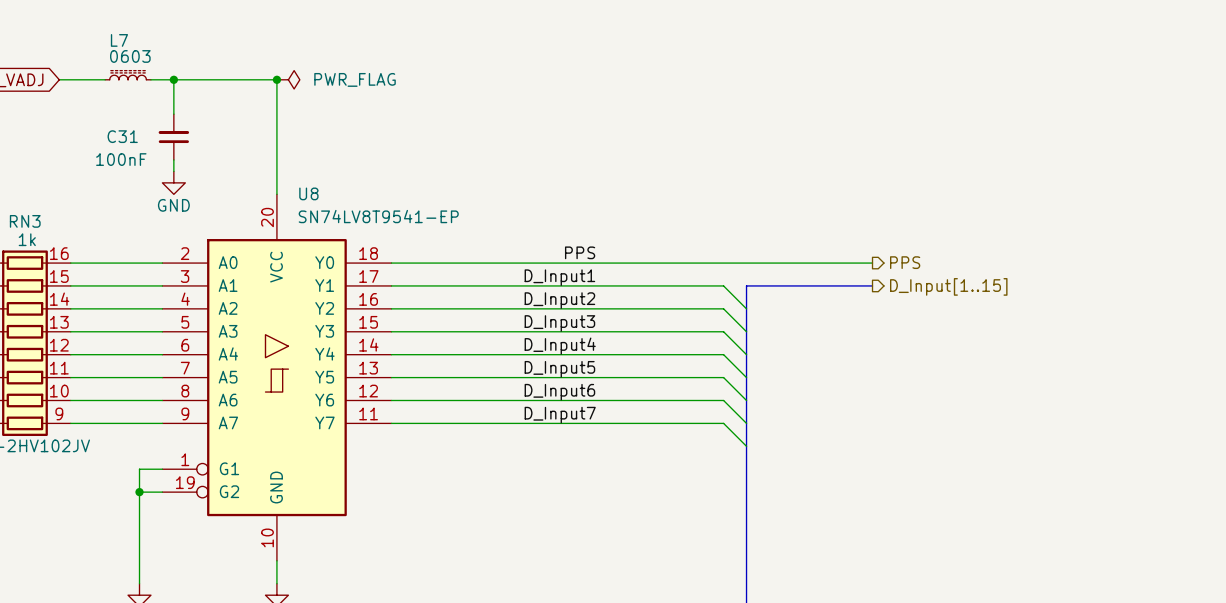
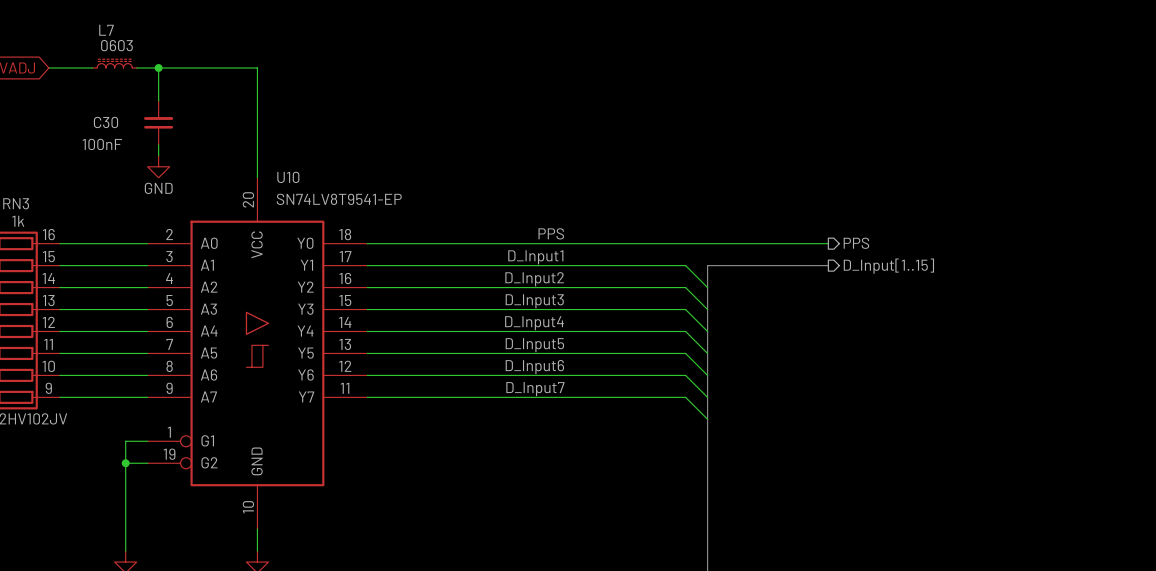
junction: (276, 79) -> none
power symbol: PWR_FLAG (288, 79) -> none
C31 name: C31 (122, 136) -> C30 (105, 122)
U8 name: U8 (308, 193) -> U10 (288, 177)

